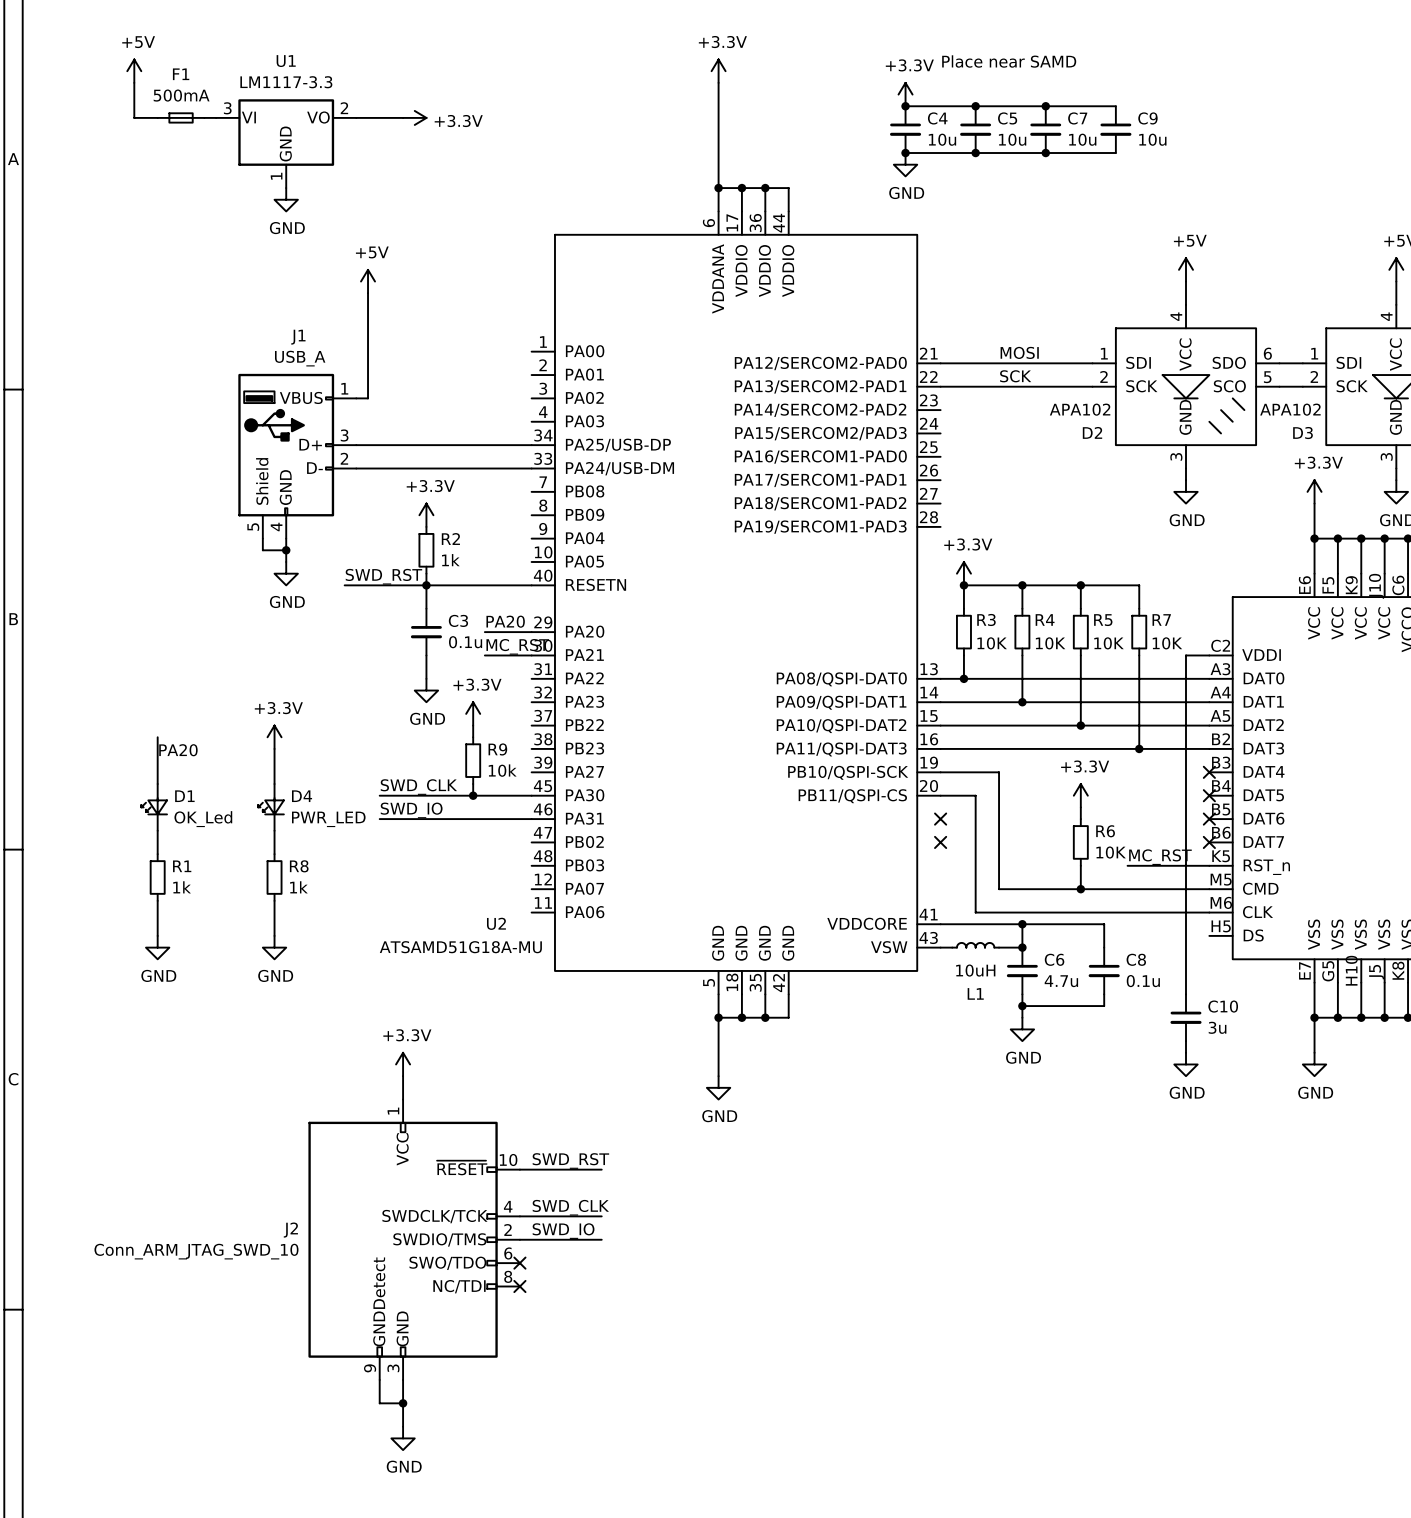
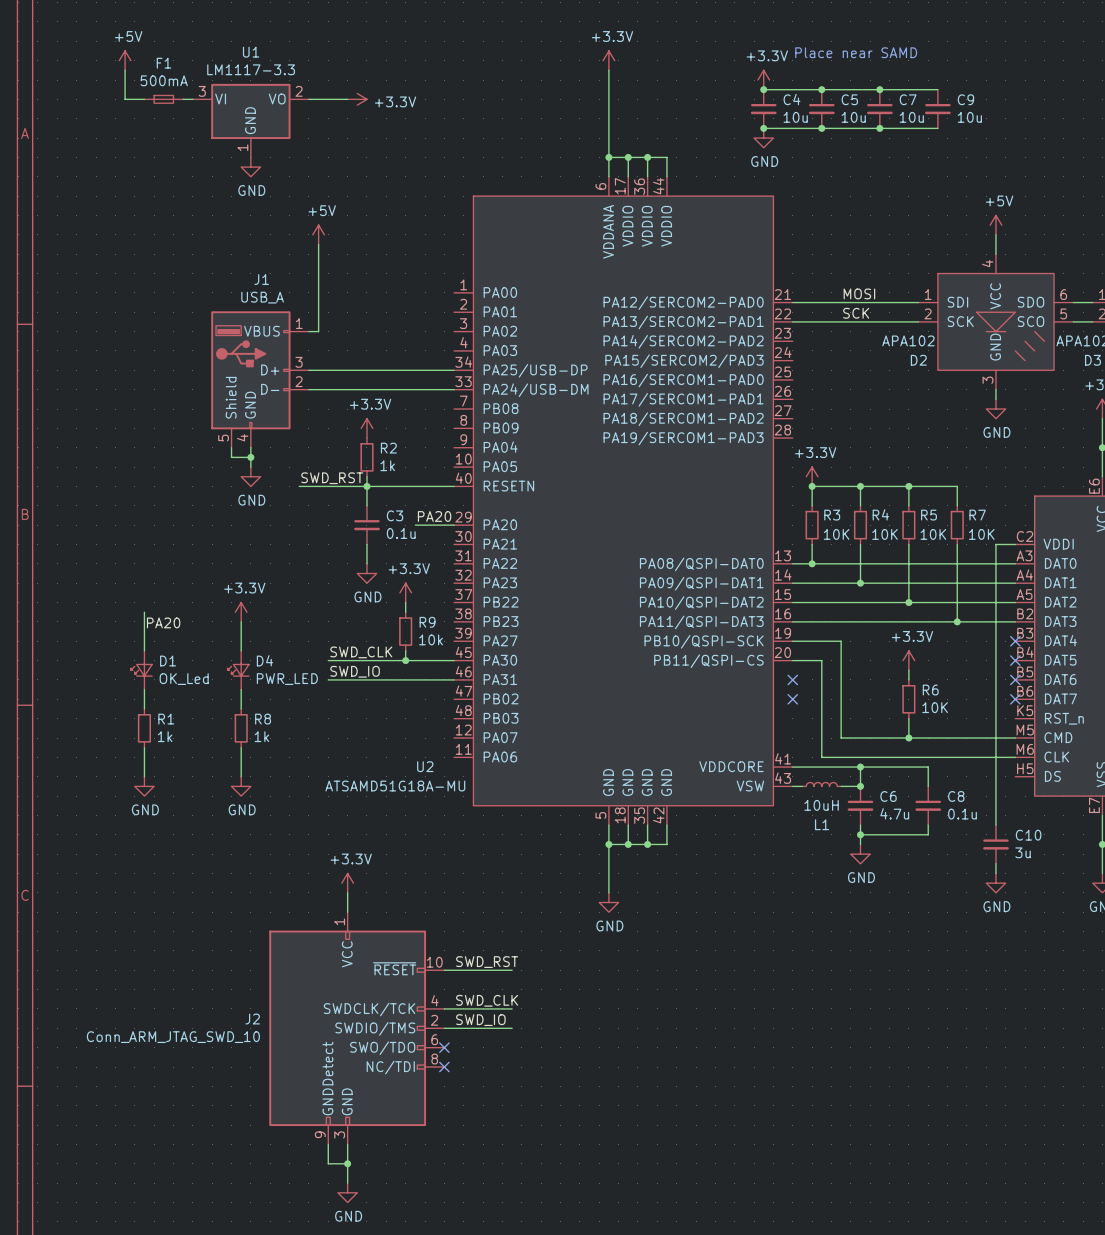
label: MC_RST (517, 646) -> none
wire: (484, 655) (531, 655) -> none
label: MC_RST (1160, 857) -> none
wire: (1127, 865) (1209, 865) -> none

